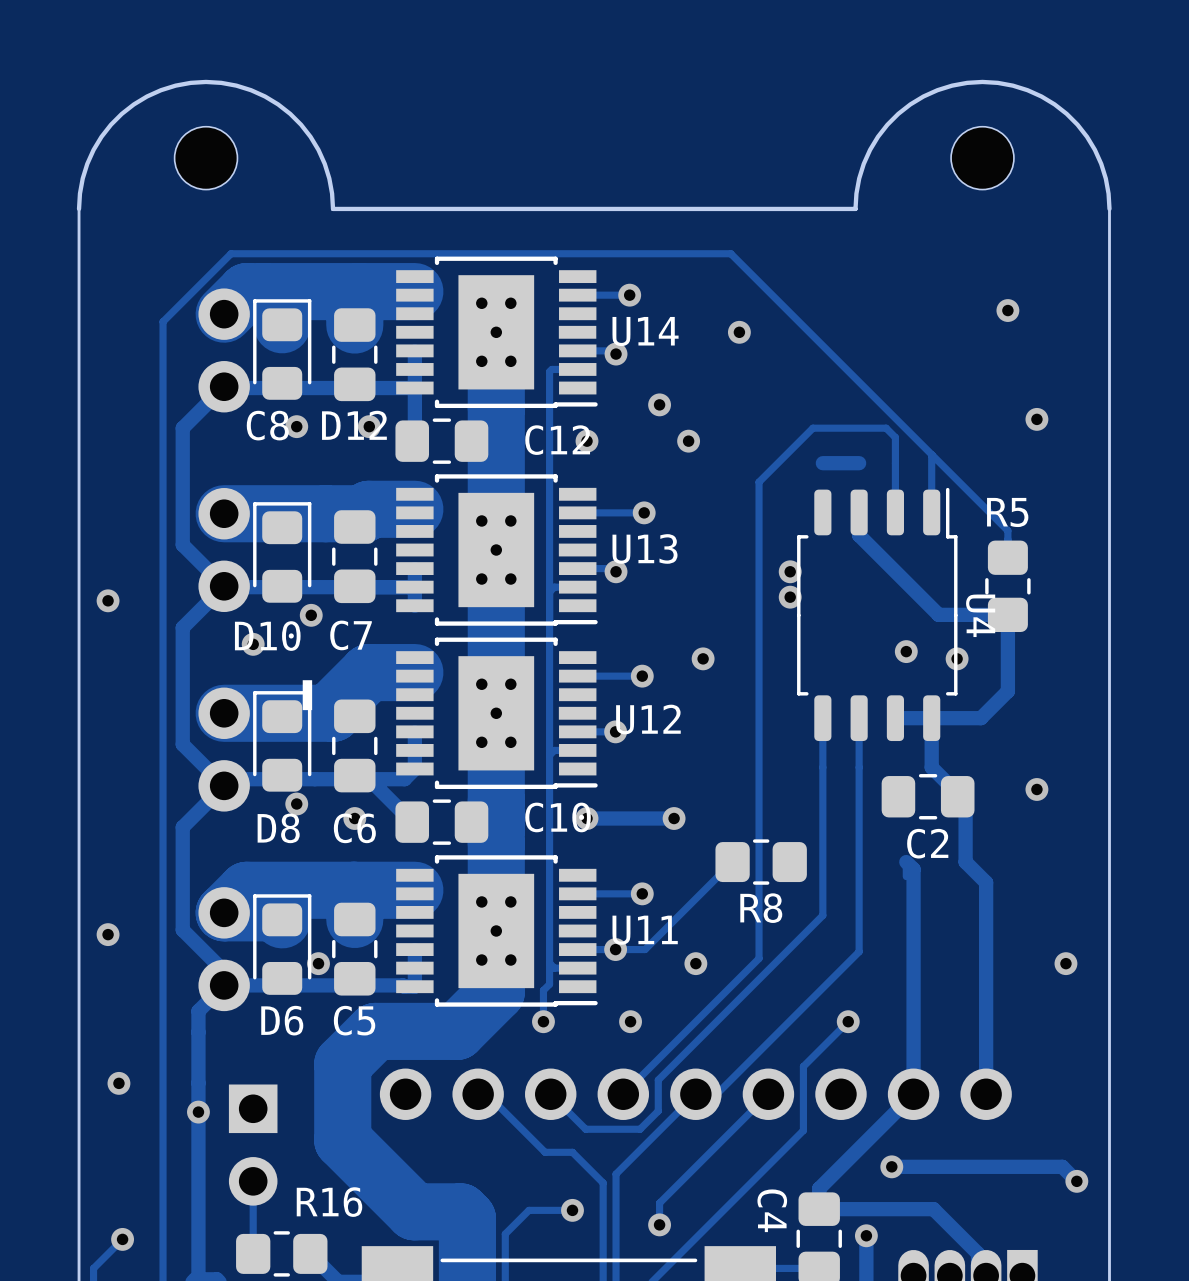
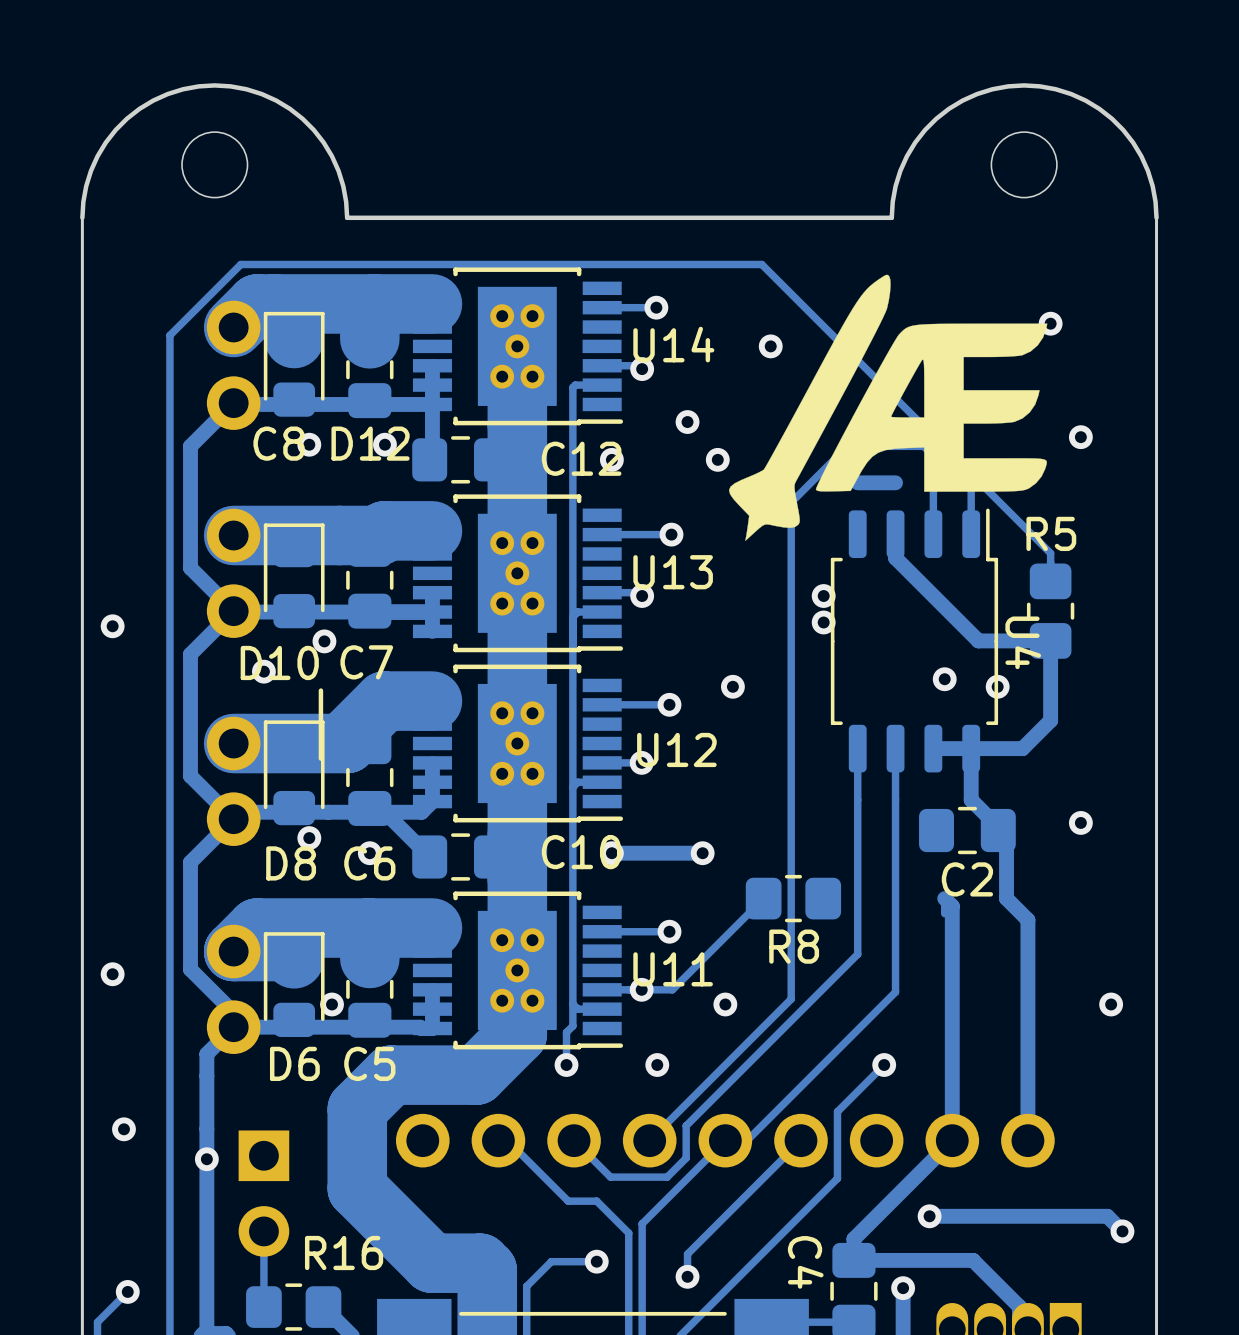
drawing: none -> [728, 274, 1048, 541]

